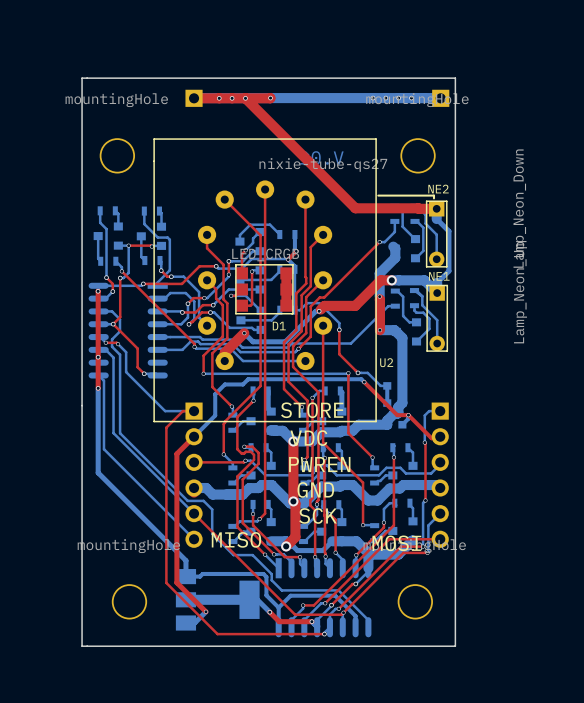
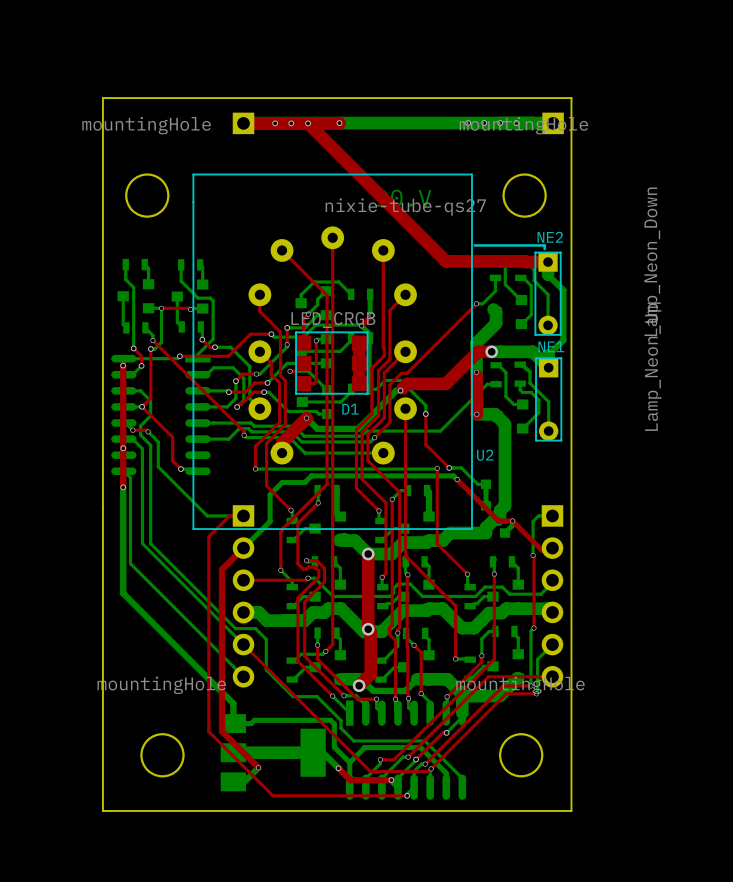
text: STORE (312, 410) -> none
text: VDC (308, 438) -> none
text: PWREN (319, 464) -> none
text: GND (315, 489) -> none
text: SCK (317, 515) -> none
text: MISO (236, 539) -> none
text: MOSI (396, 543) -> none

